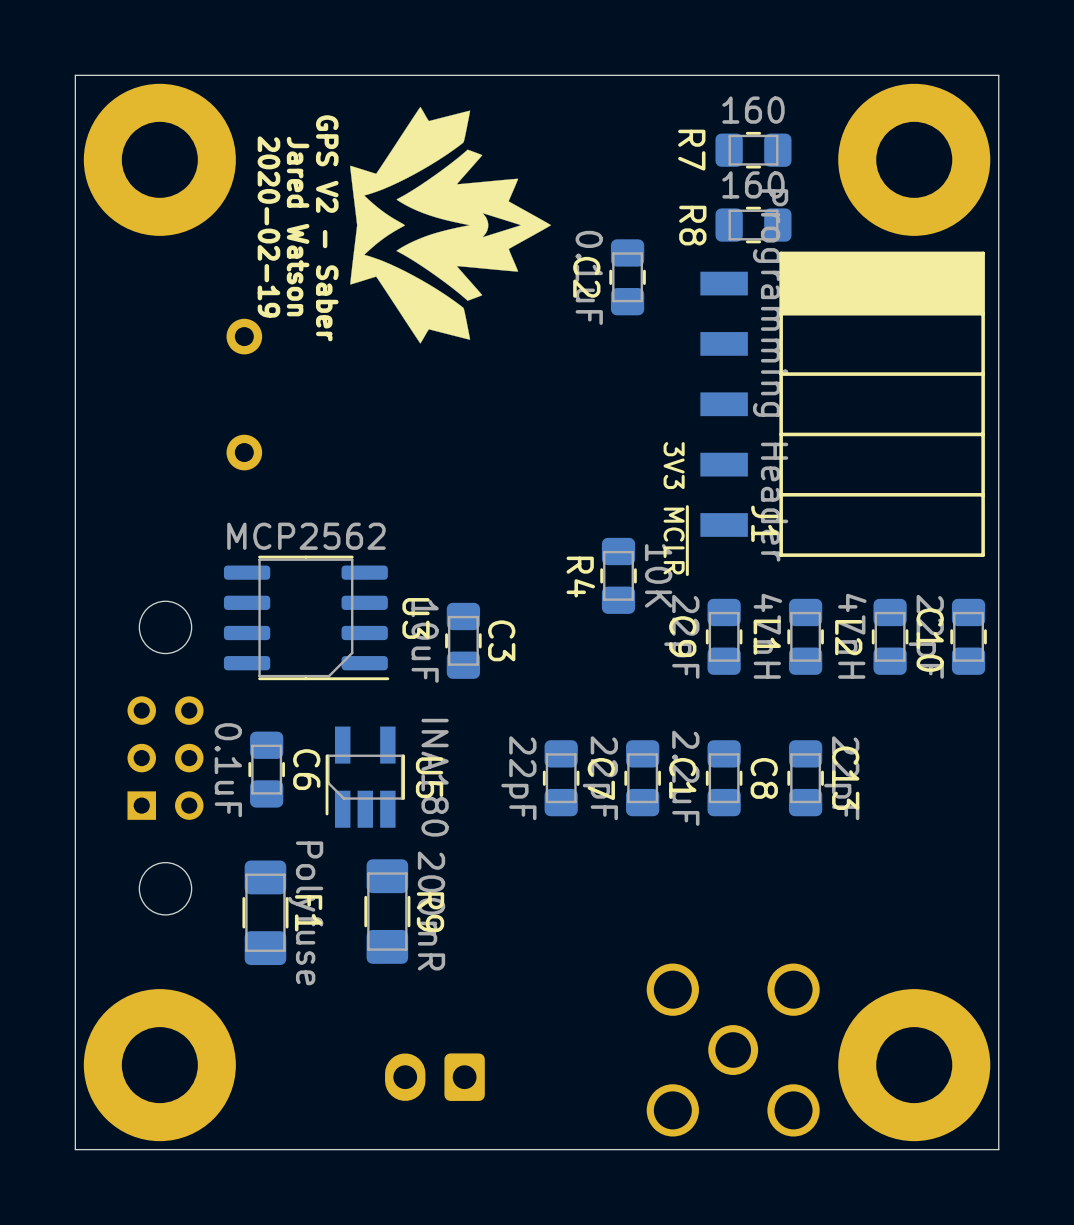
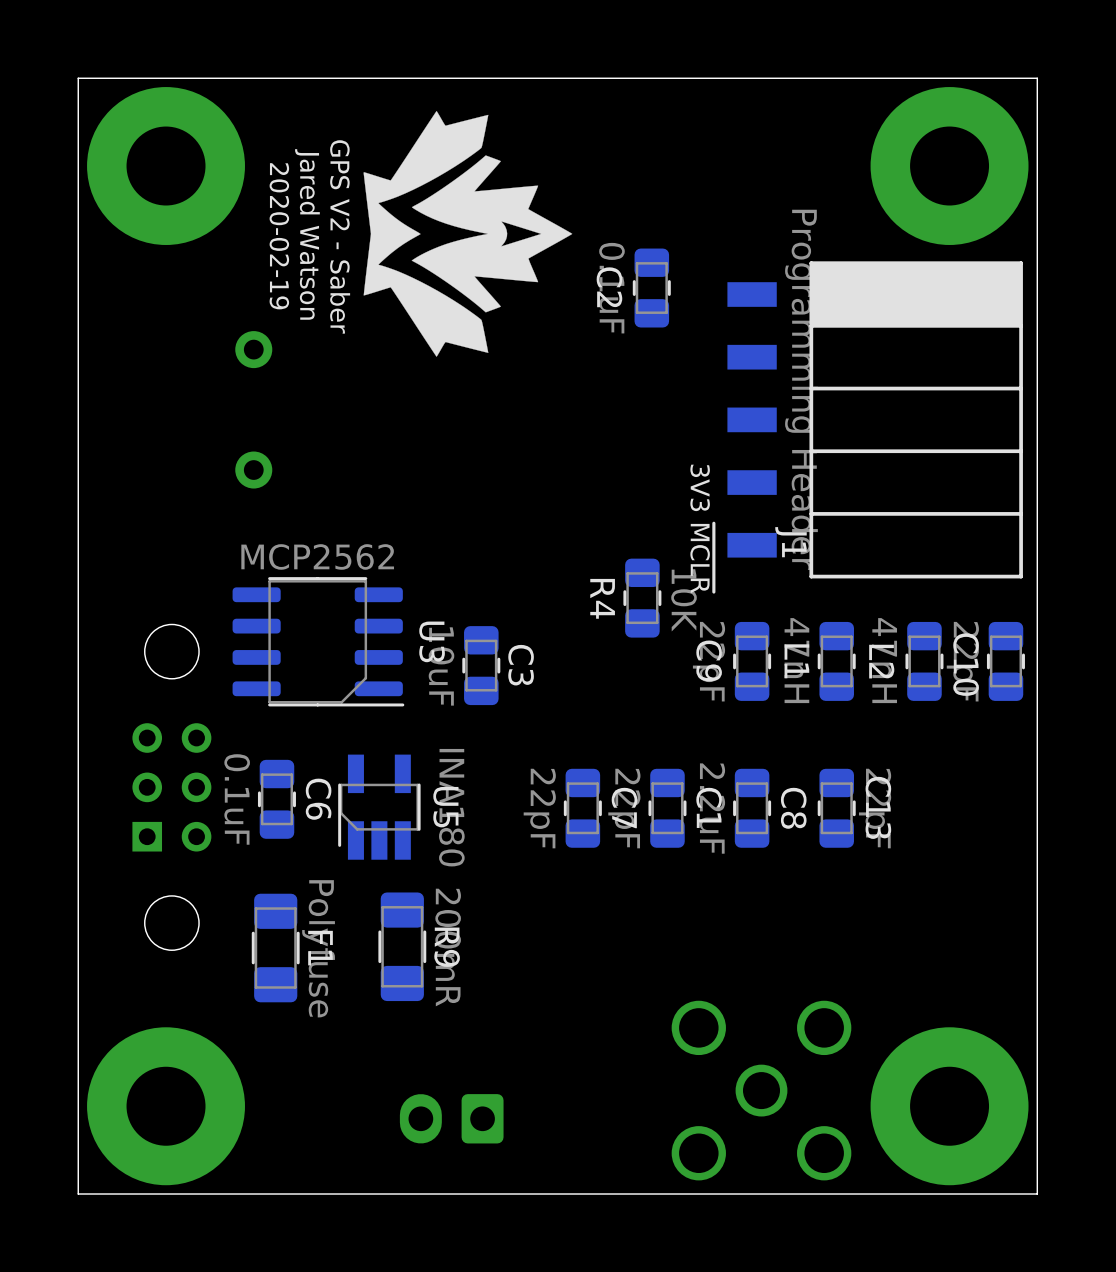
R7: 160 (753, 150) -> none
R8: 160 (753, 225) -> none

